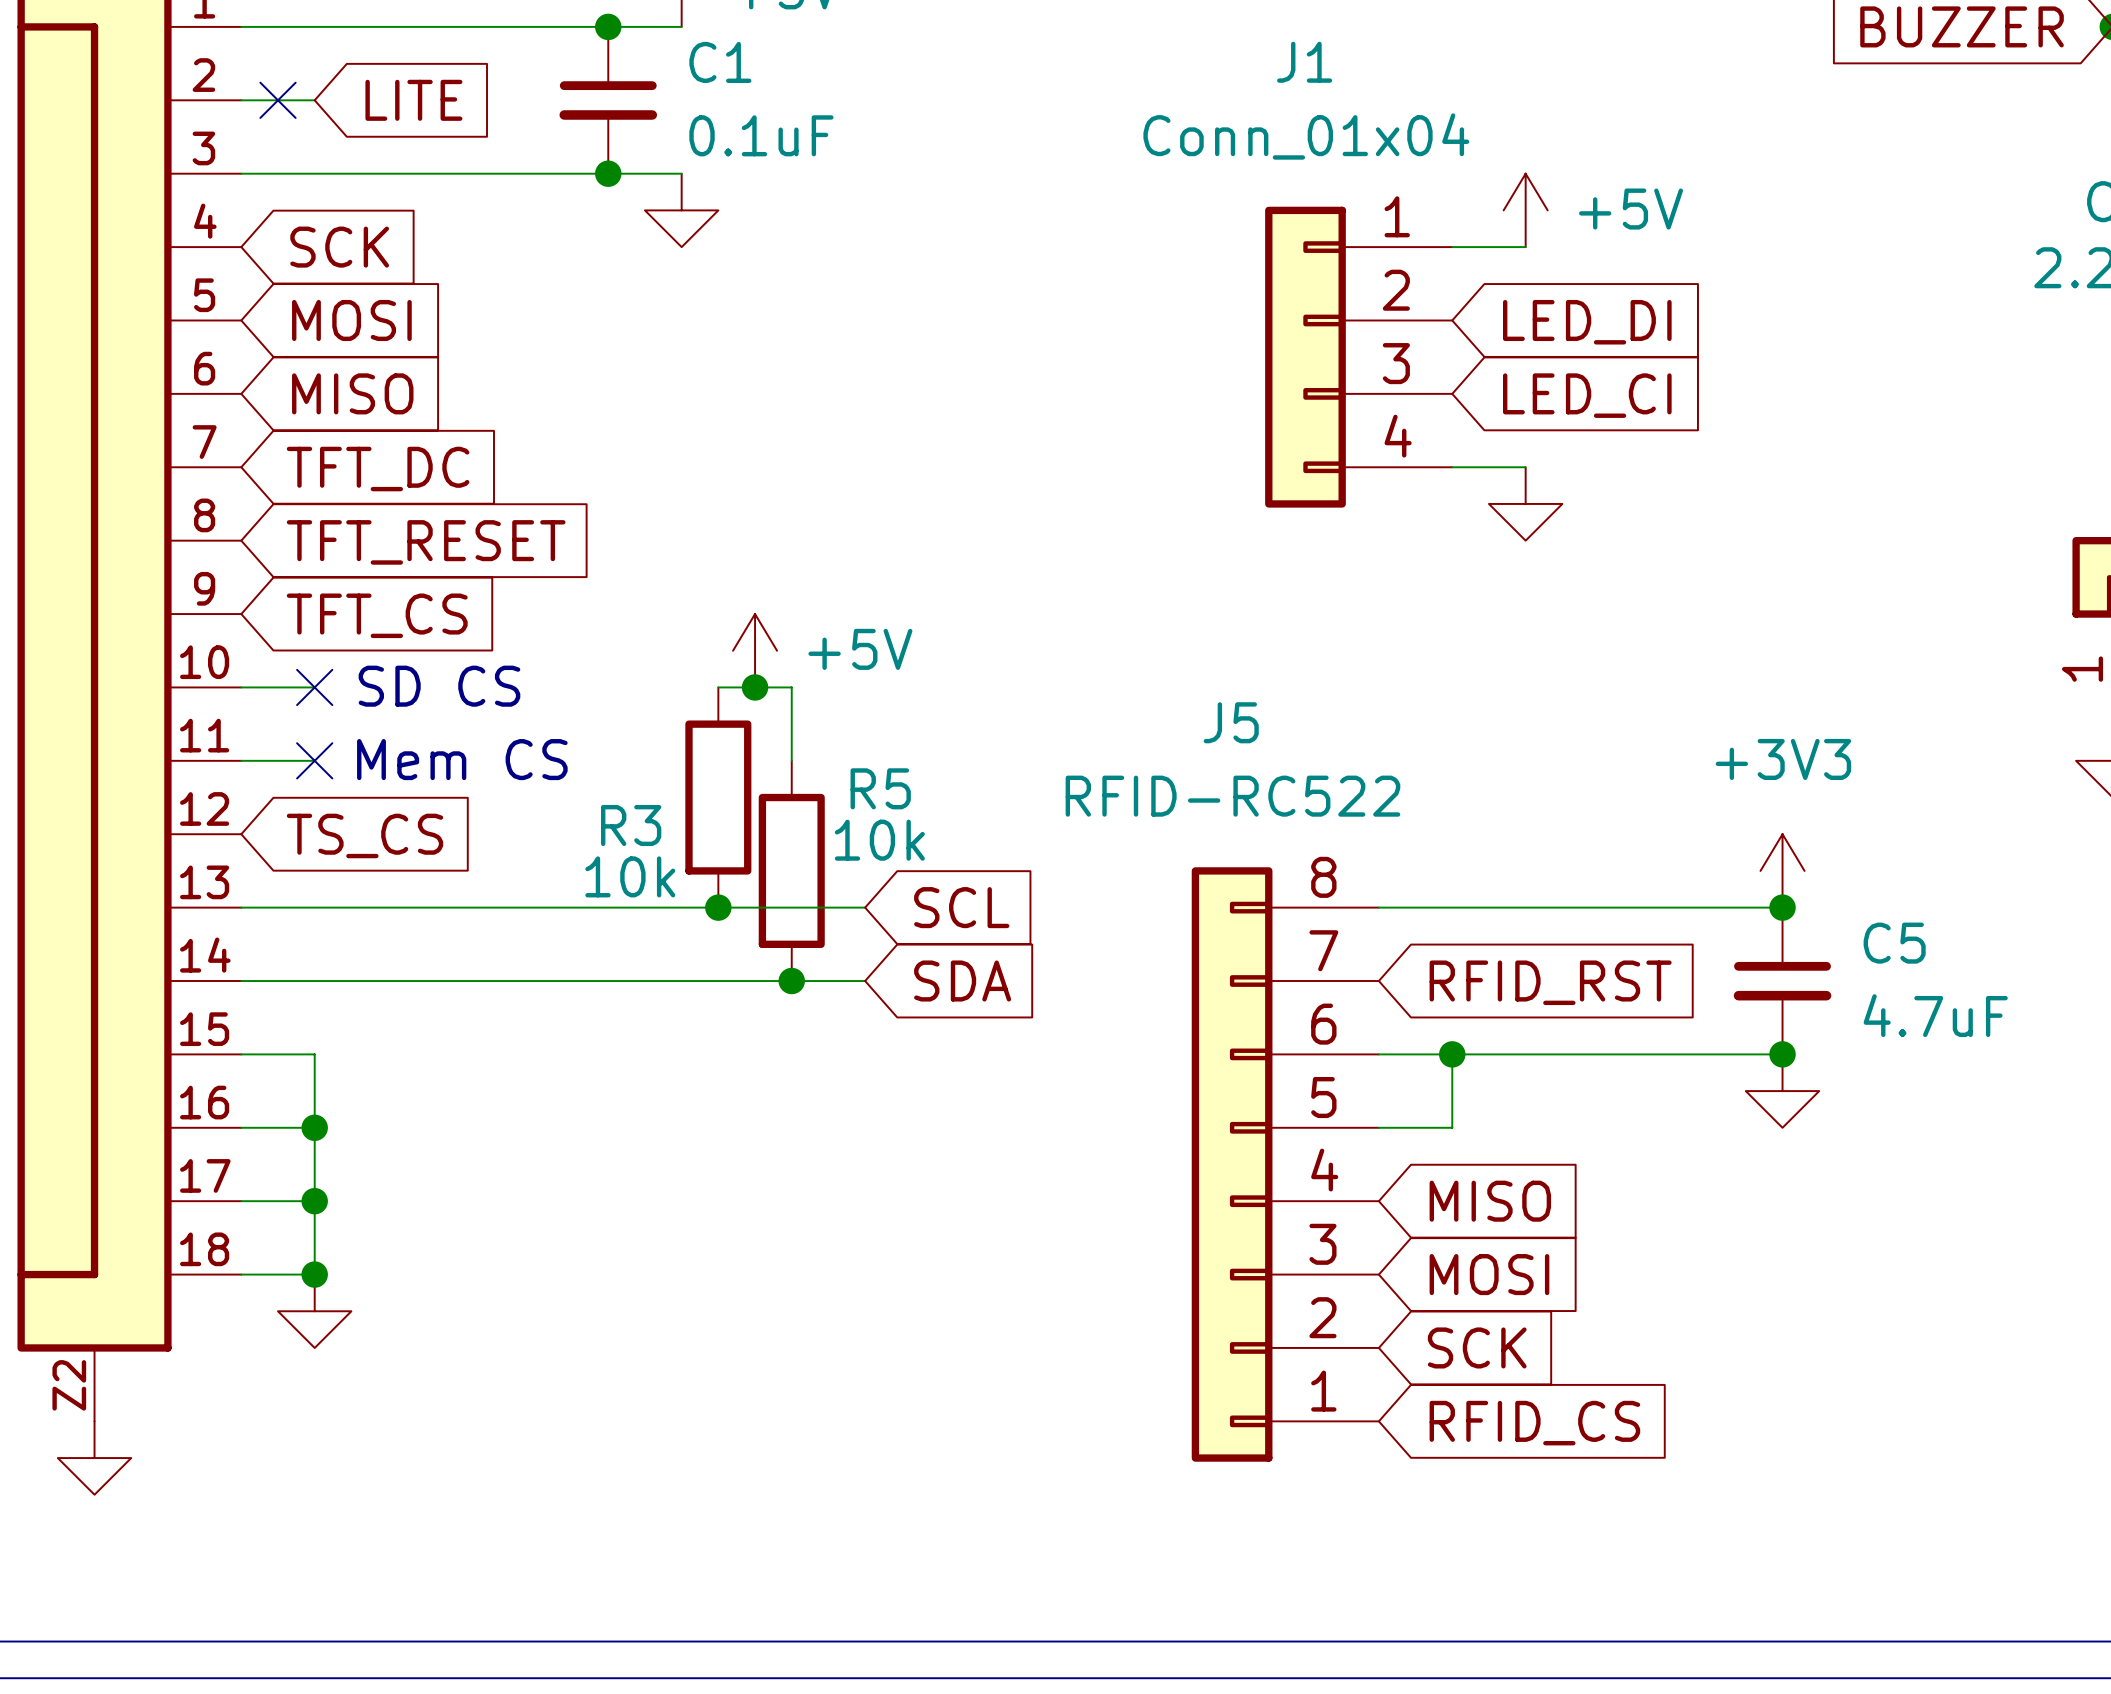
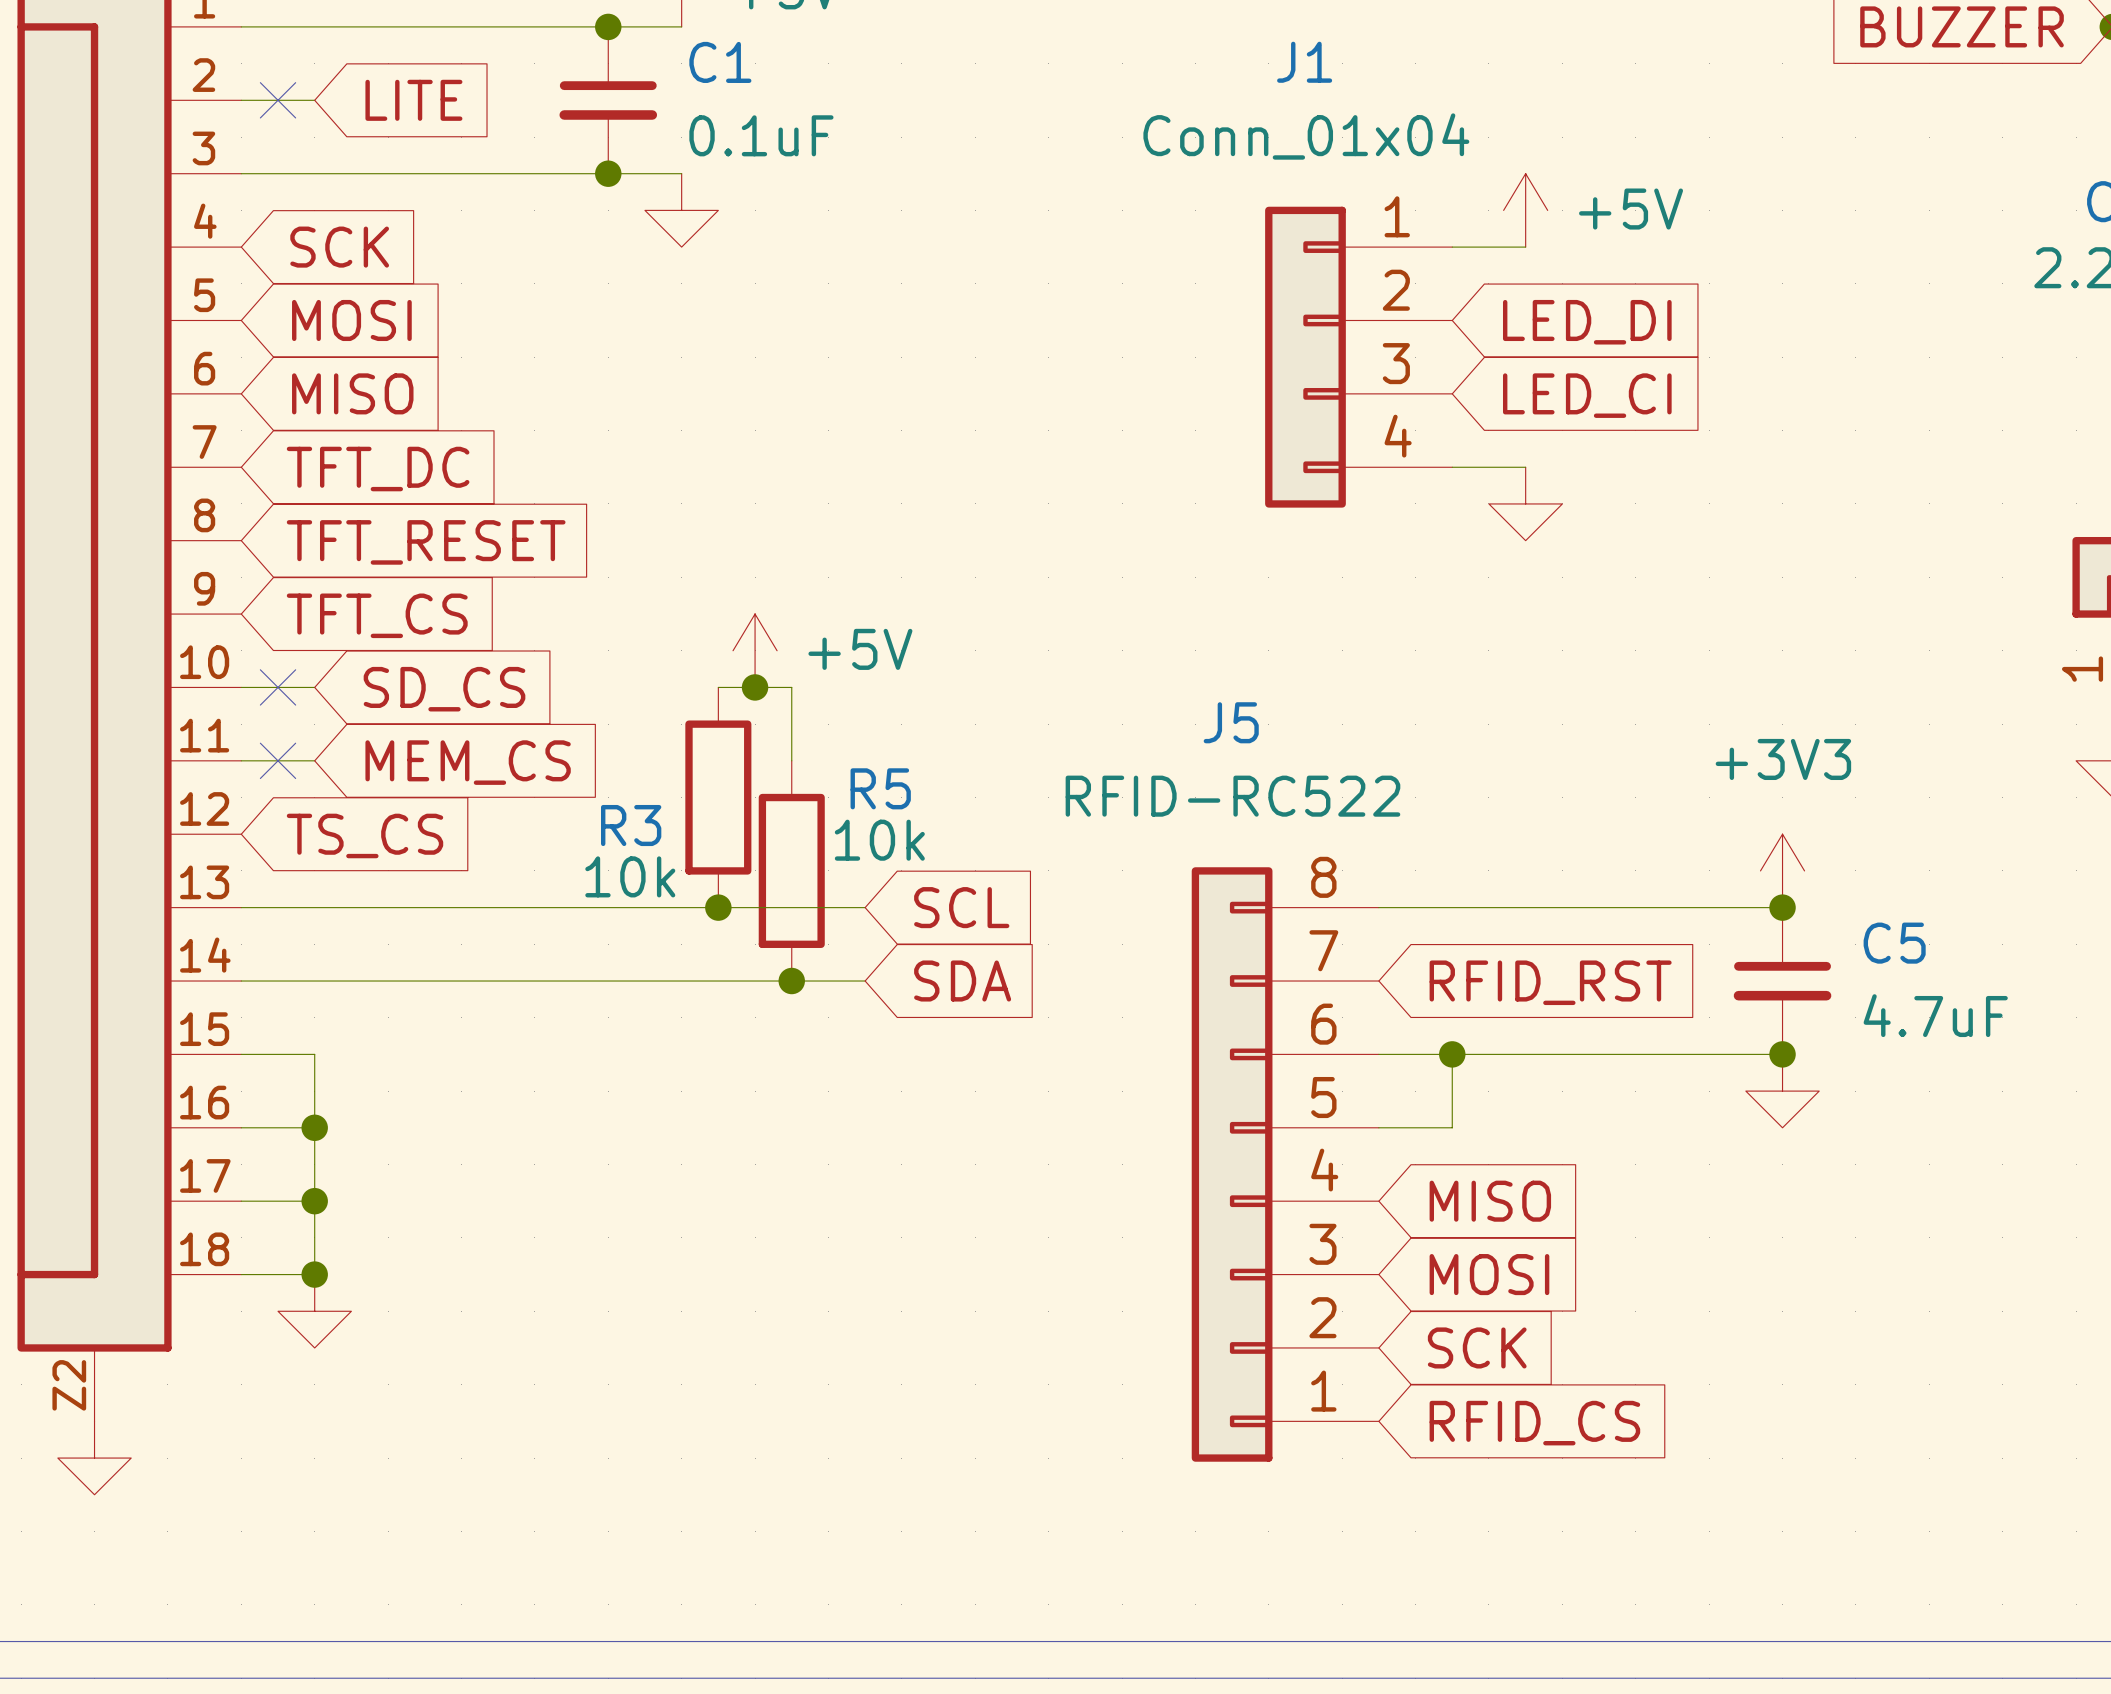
text: SD CS (439, 686) -> none
no-connect mark position: (314, 687) -> (278, 687)
global label: none -> SD_CS (444, 689)
text: Mem CS (462, 759) -> none
no-connect mark position: (314, 760) -> (278, 760)
global label: none -> MEM_CS (468, 762)

